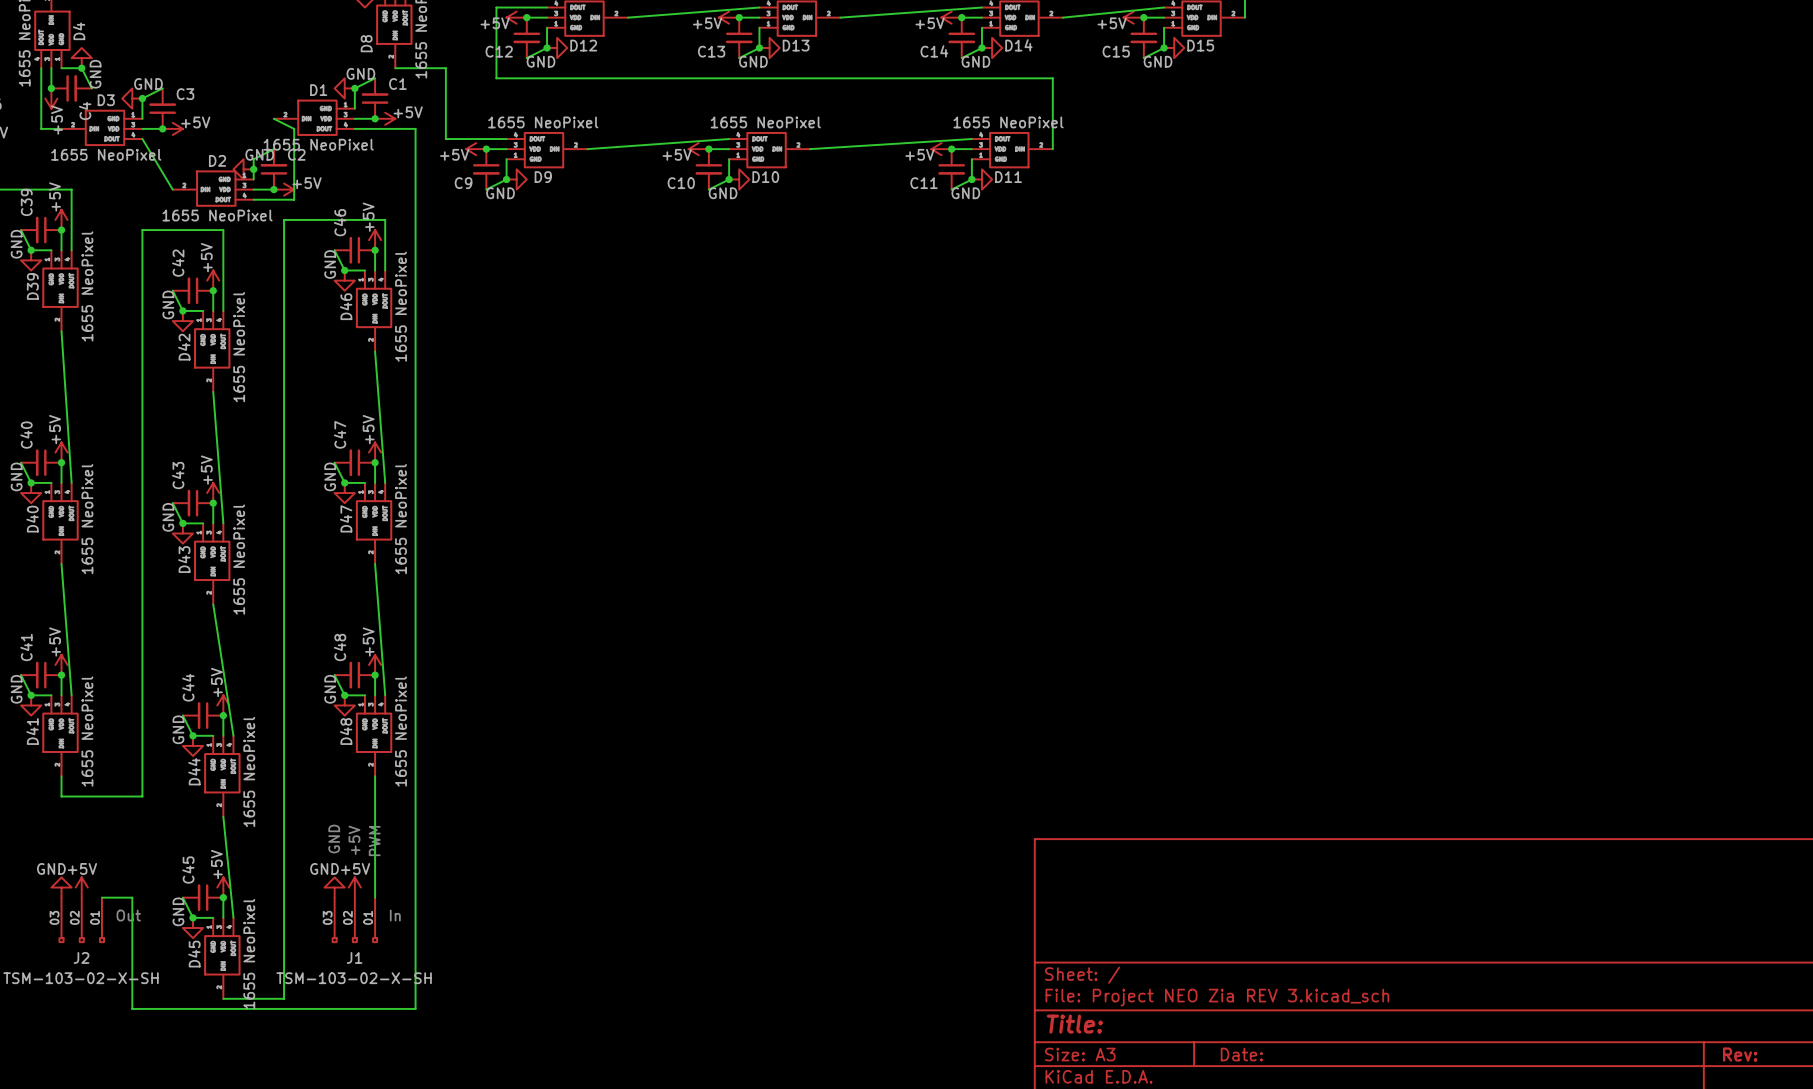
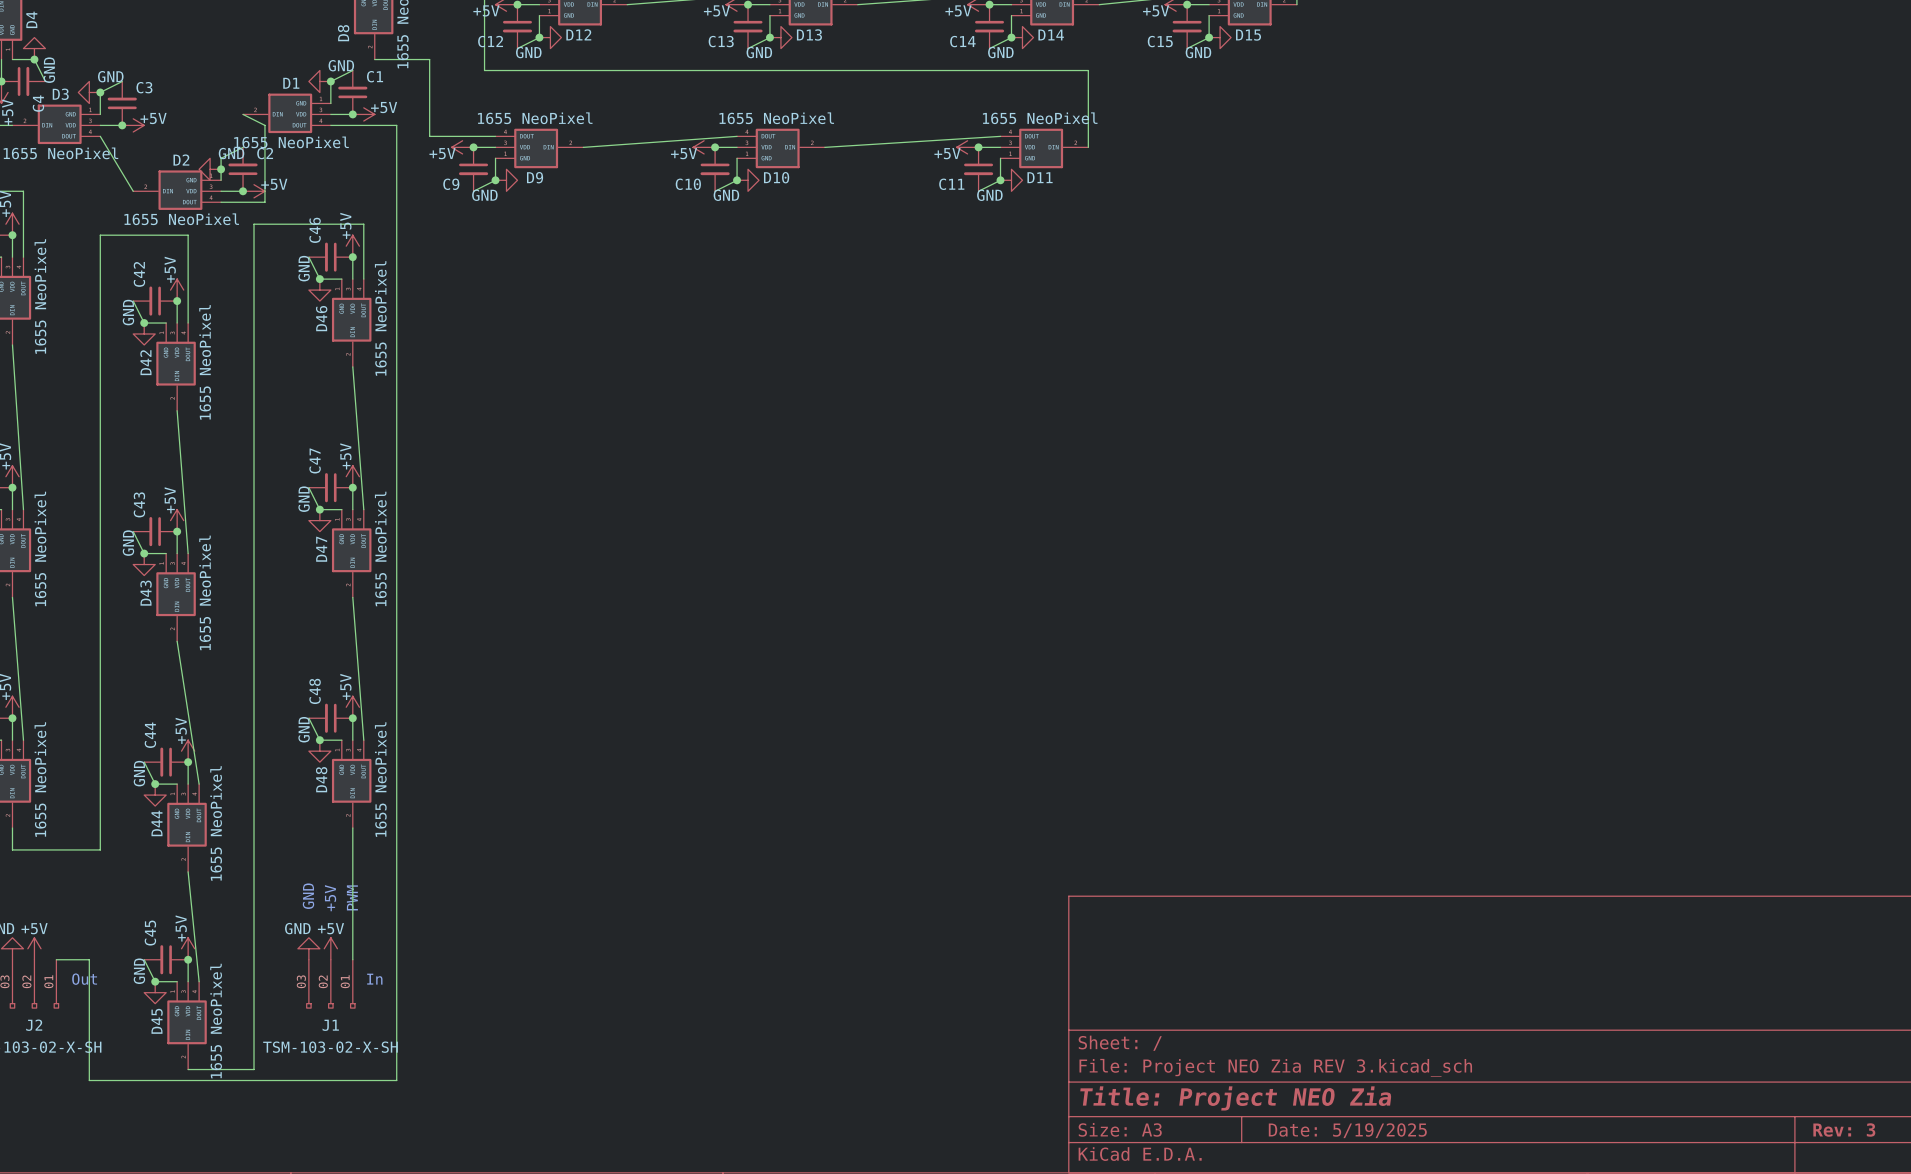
title block: Title: (1074, 1024) -> Title: Project NEO Zia (1235, 1098)
title block: Date: (1241, 1054) -> Date: 5/19/2025 (1347, 1130)
title block: Rev: (1740, 1054) -> Rev: 3 (1844, 1129)

